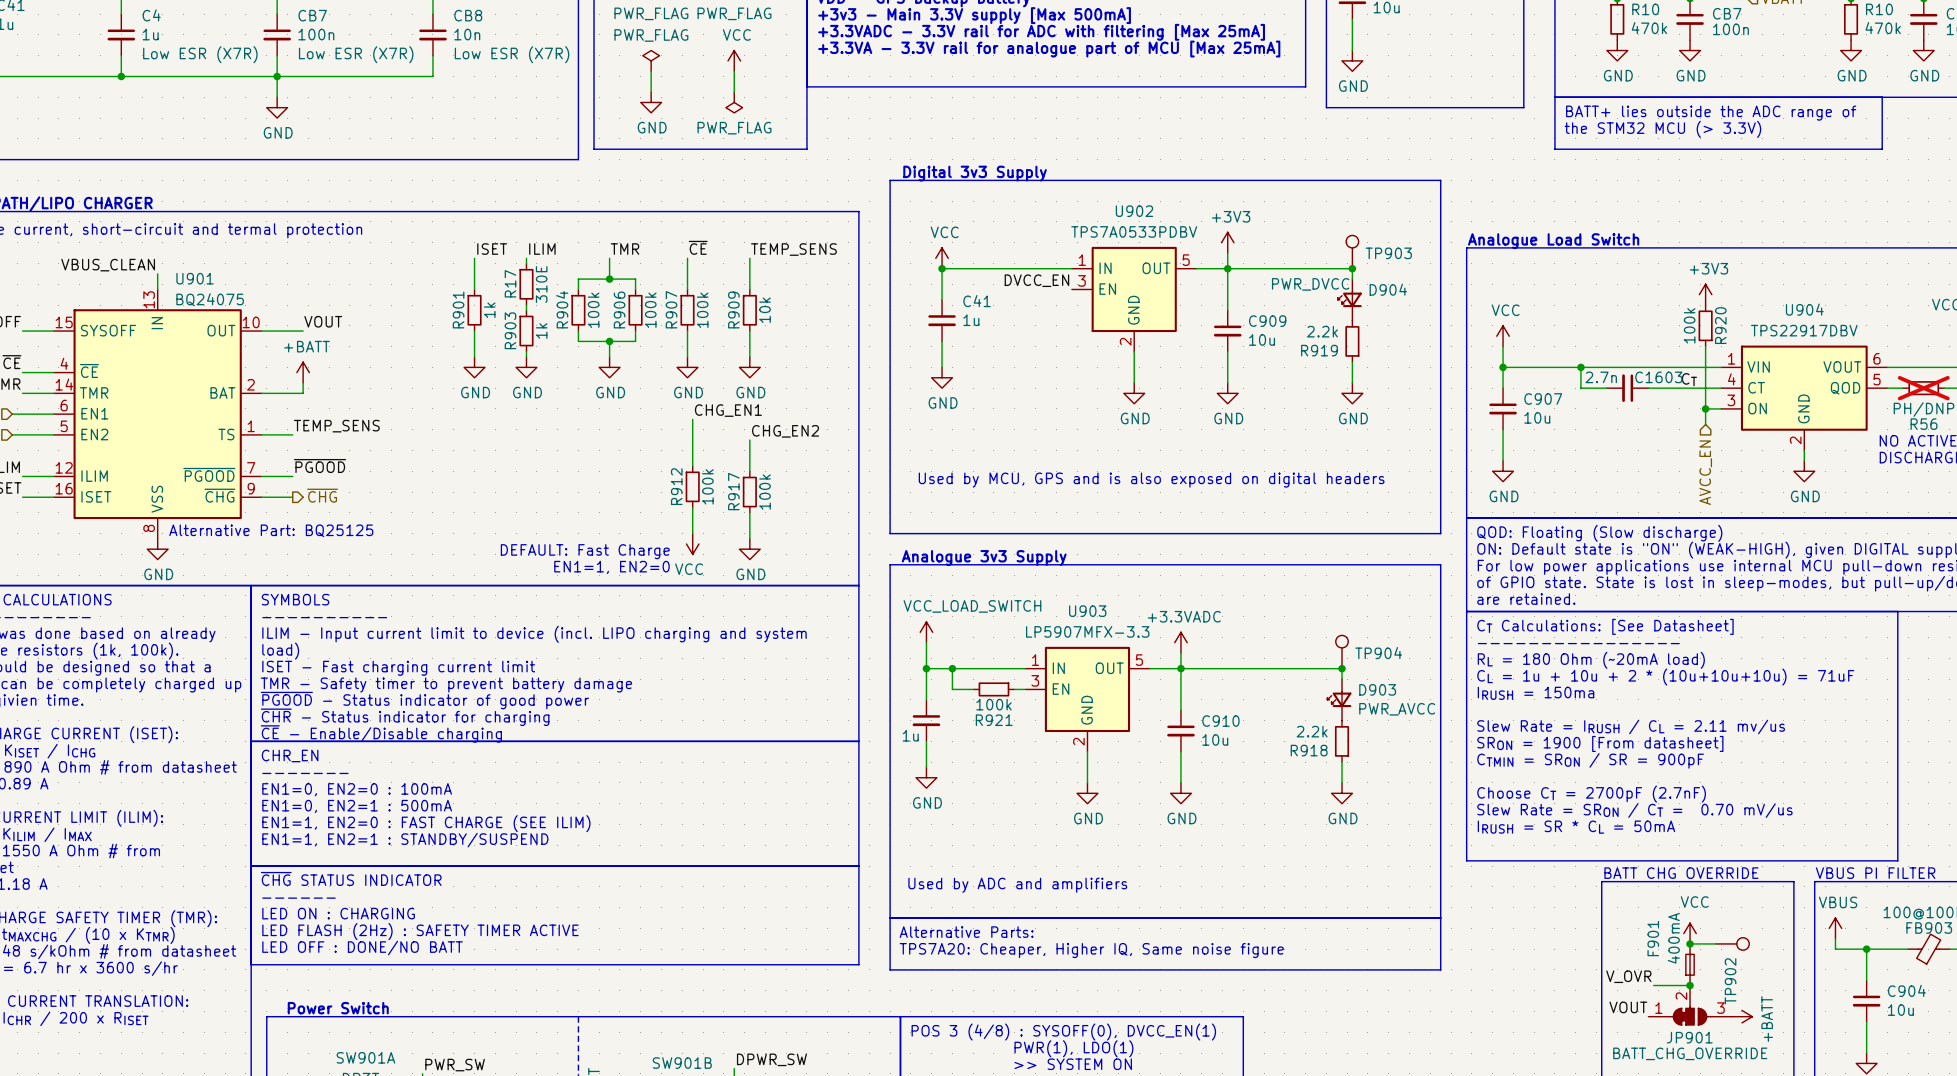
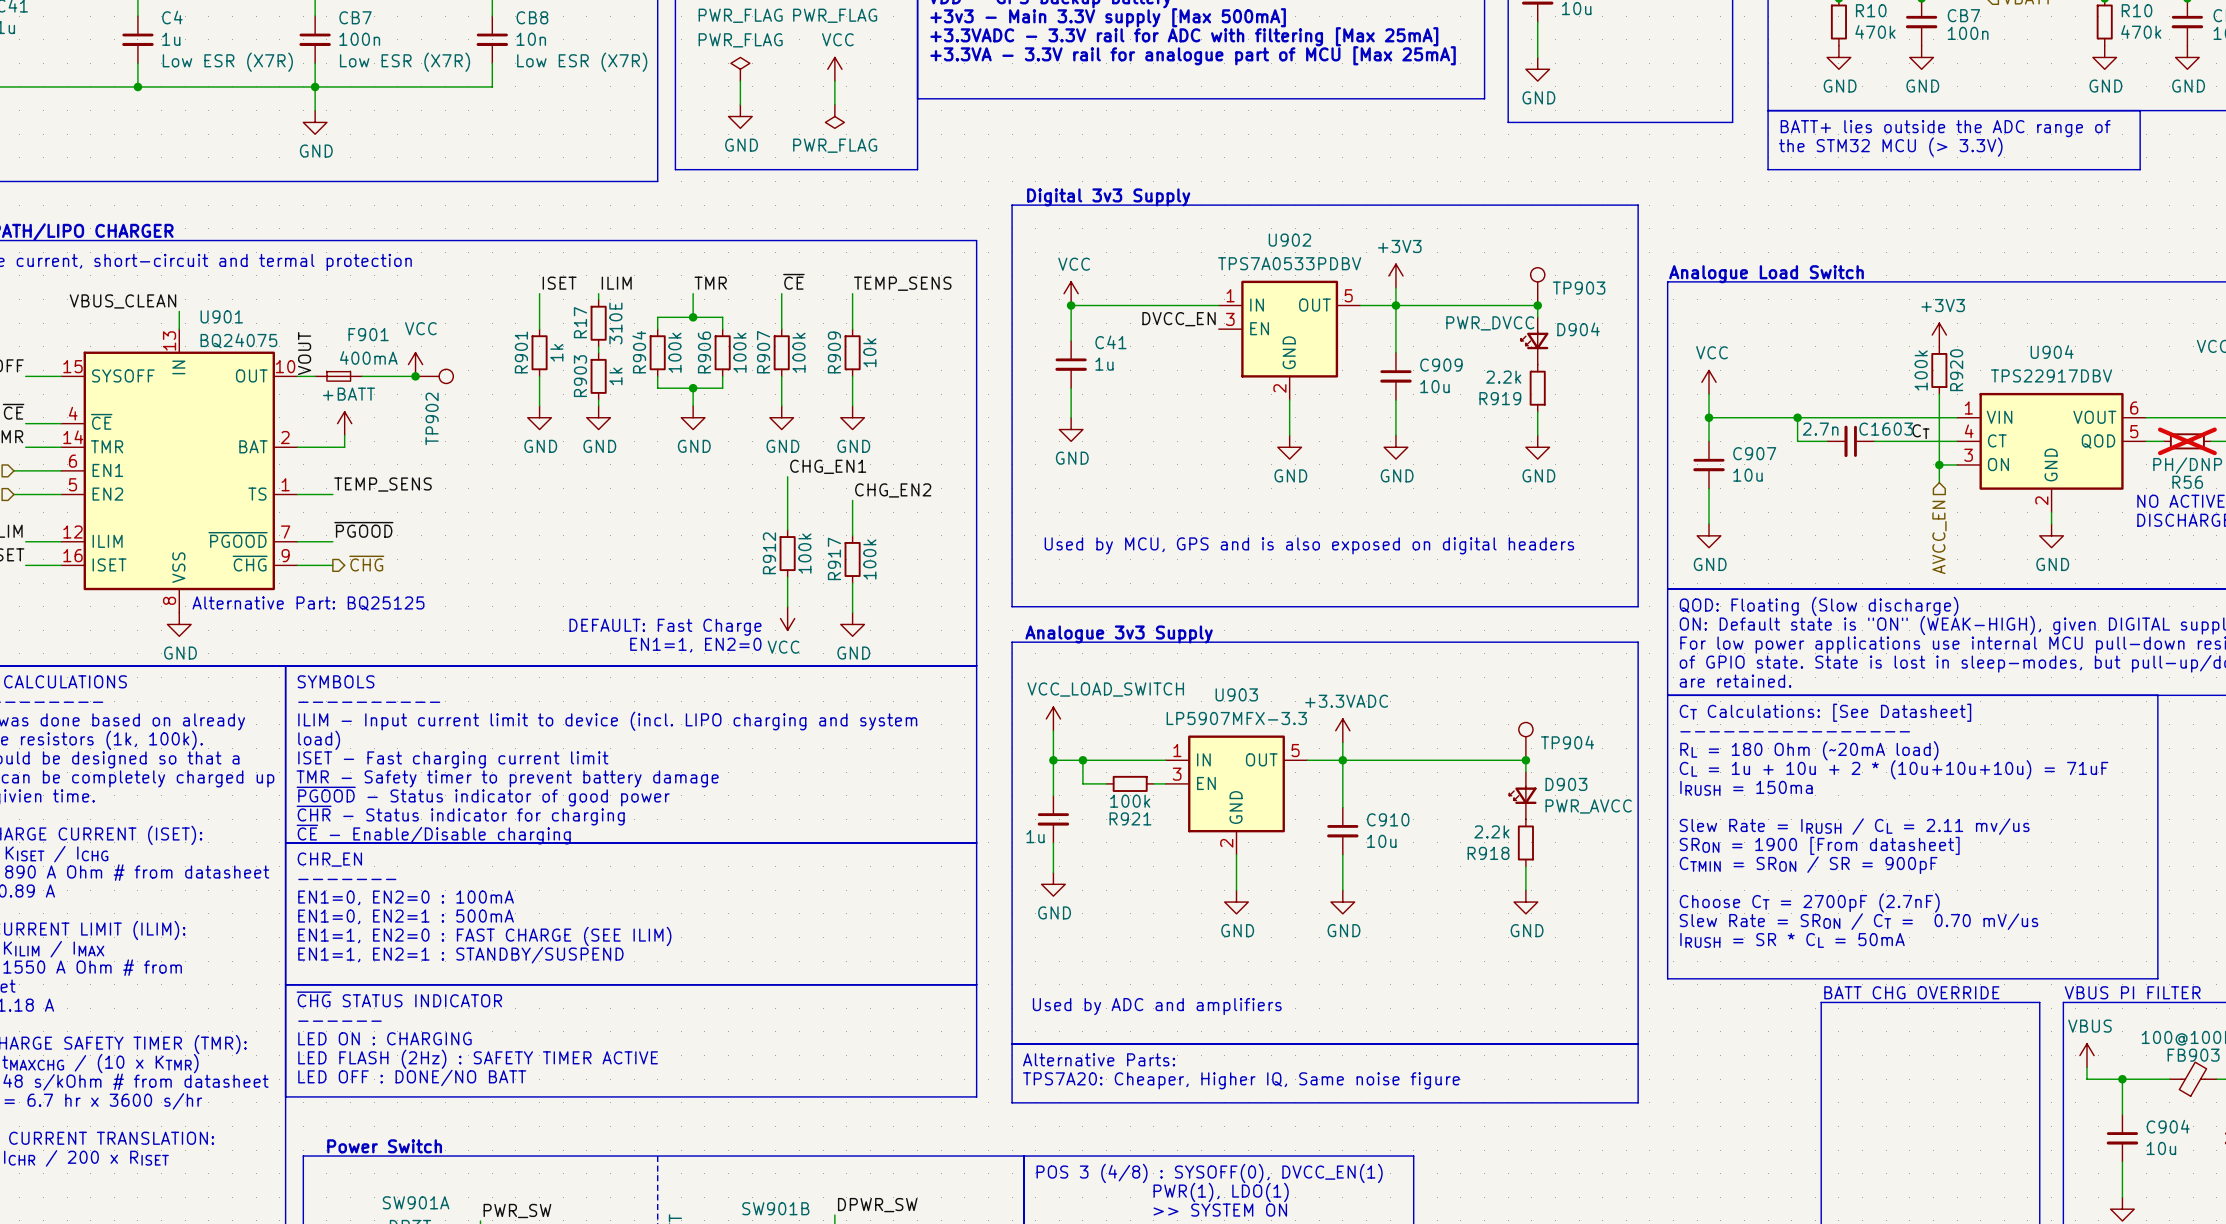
power symbol: none -> VCC (415, 364)
label rotation: 0° (323, 321) -> 90° counterclockwise (304, 353)
label position: VOUT (323, 321) -> VOUT (304, 353)
wire: none -> (362, 376) (415, 376)
junction: none -> (415, 376)
power symbol: VCC (1690, 933) -> none
wire: (1690, 943) (1715, 943) -> none
junction: (1690, 943) -> none
TP902 position: (1732, 943) -> (434, 376)
F901 rotation: 0° (1690, 964) -> 90° clockwise (338, 376)
F901 position: (1690, 964) -> (338, 376)
label: V_OVR (1628, 976) -> none
wire: (1653, 985) (1690, 985) -> none
junction: (1690, 985) -> none
JP901: BATT_CHG_OVERRIDE (1690, 1005) -> none
label: VOUT (1628, 1007) -> none
power symbol: +BATT (1741, 1016) -> none

